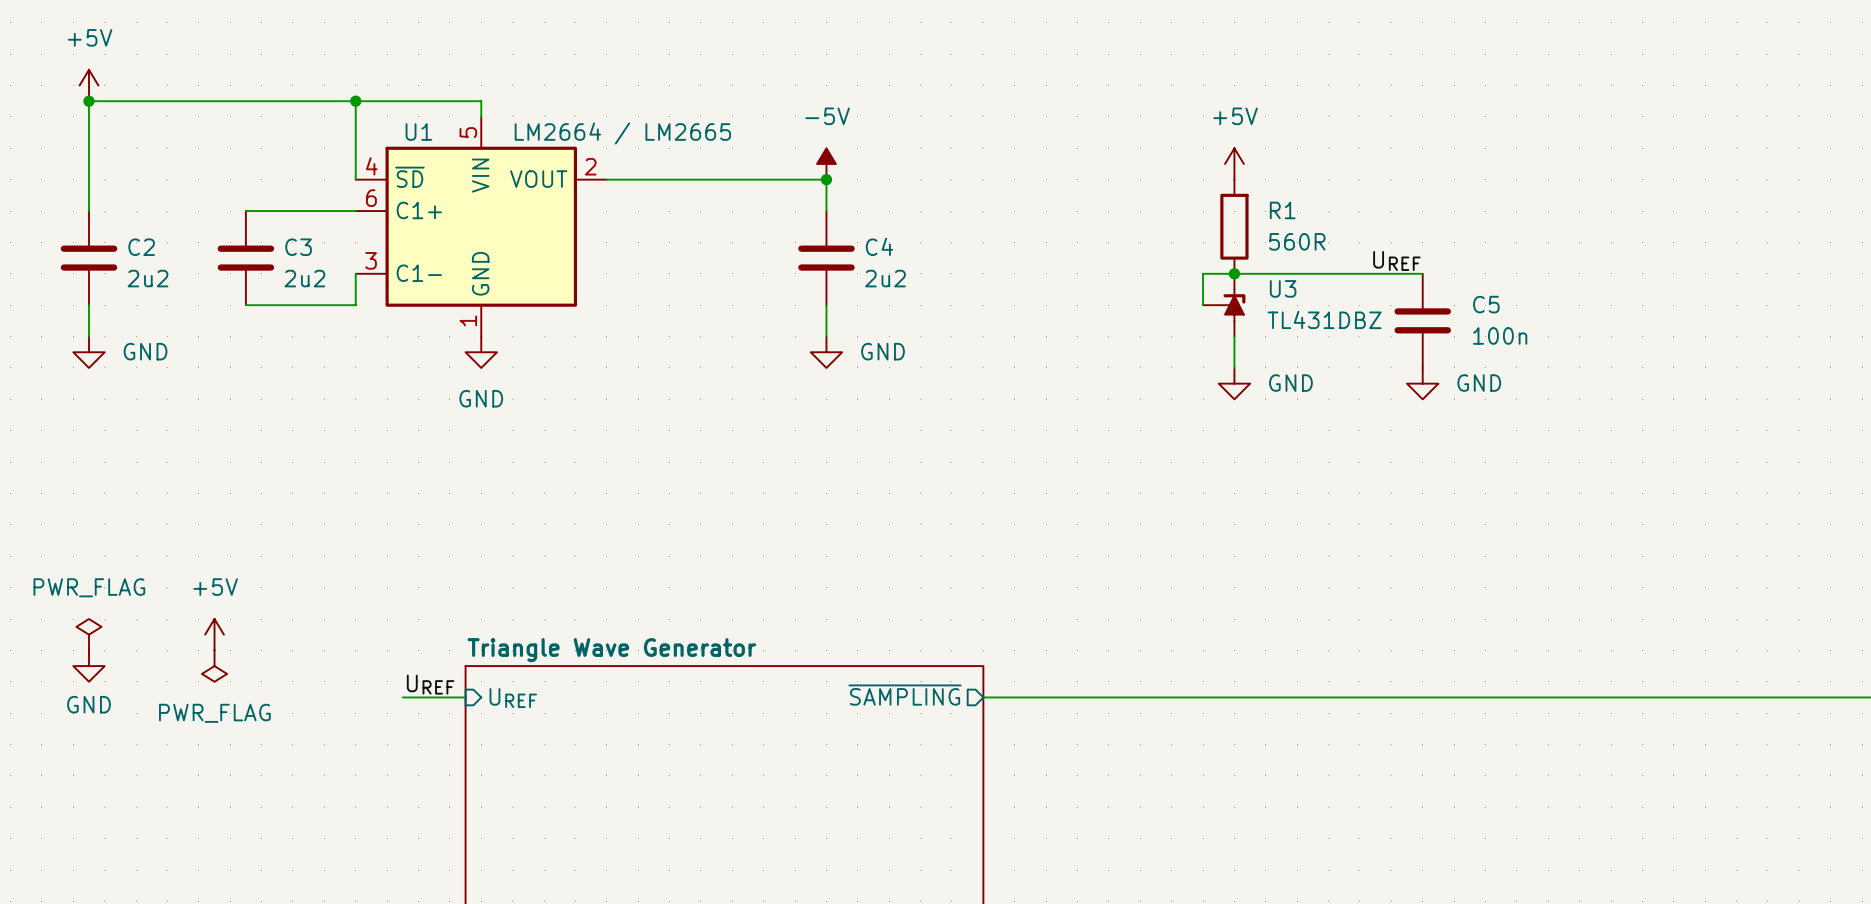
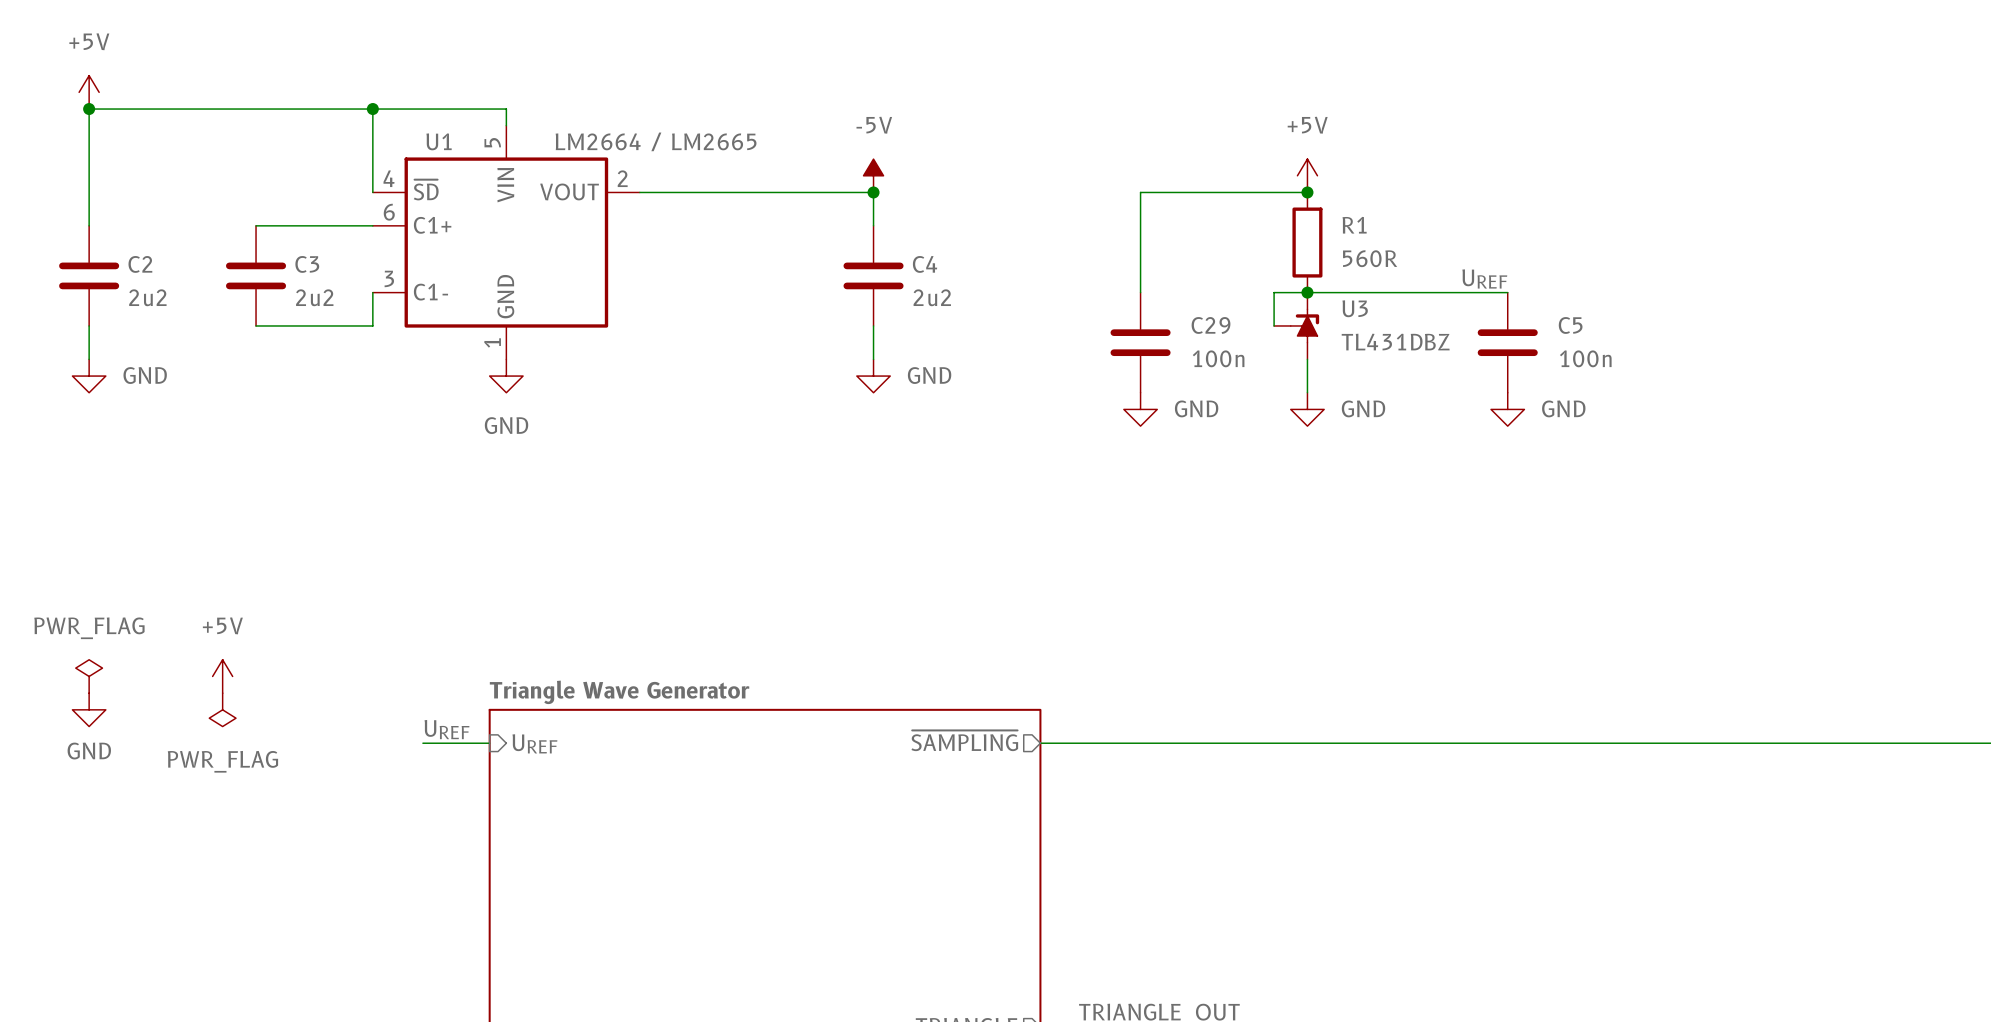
wire: none -> (1307, 192) (1140, 192) (1140, 292)
junction: none -> (1307, 192)
C29: none -> 100n (1140, 342)
power symbol: none -> GND (1140, 409)

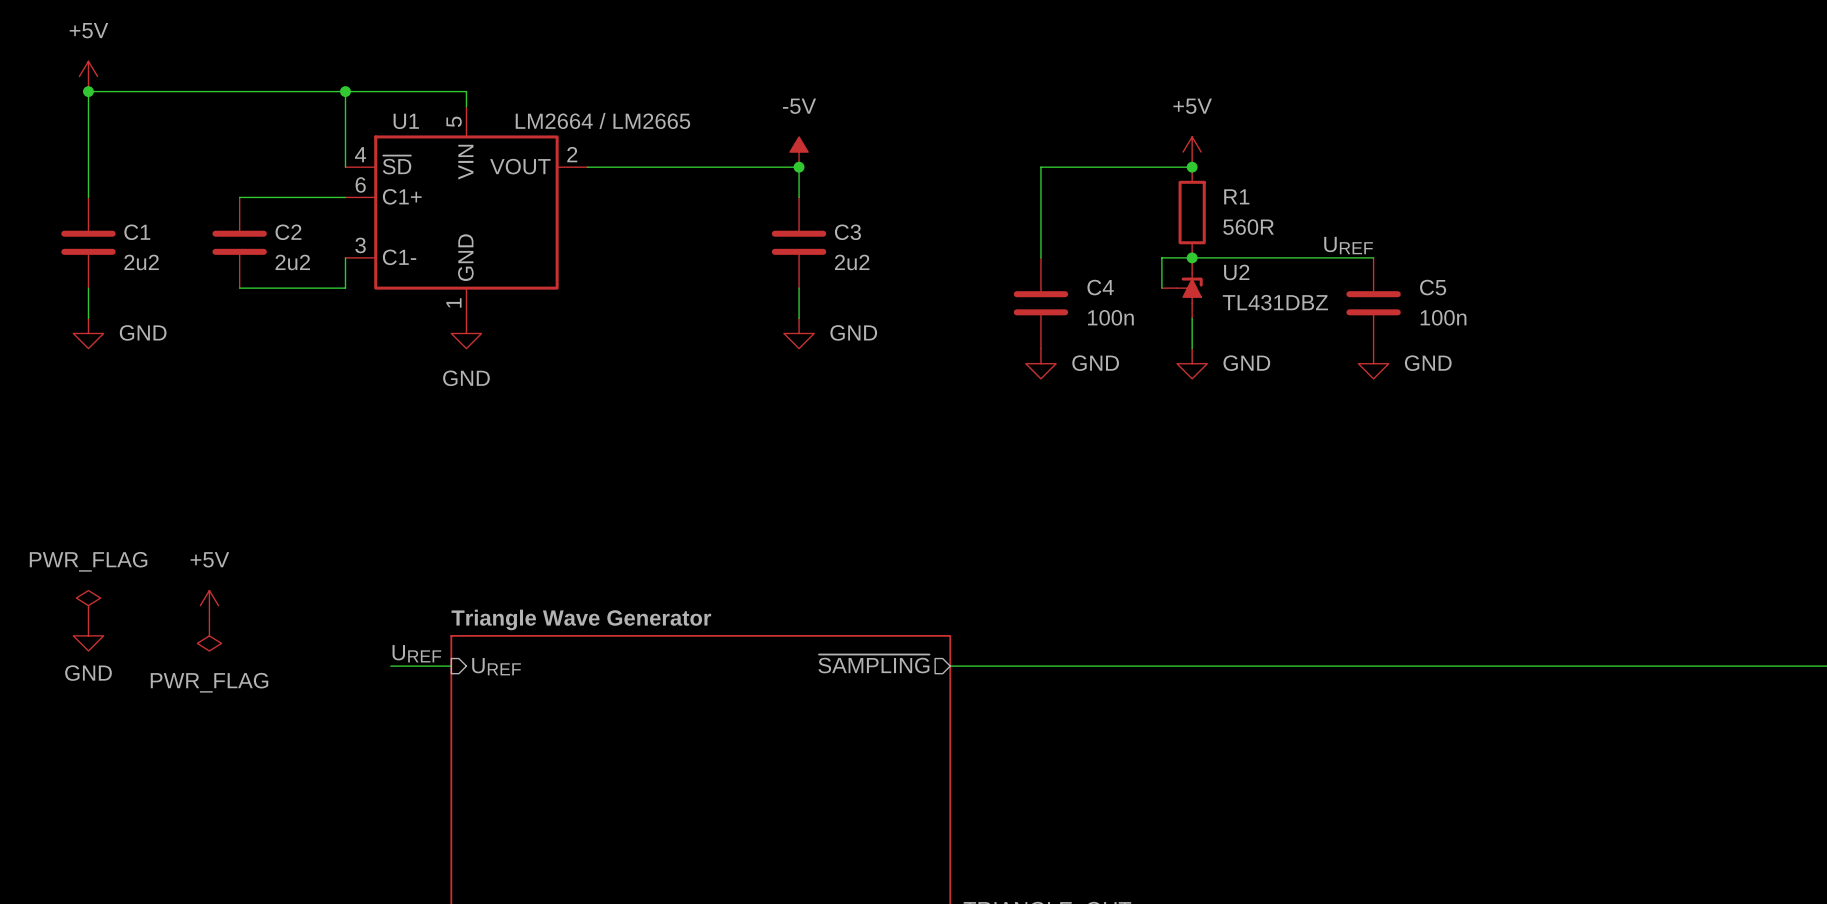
C2 name: C2 (140, 264) -> C1 (137, 232)
C3 name: C3 (307, 264) -> C2 (288, 232)
C4 name: C4 (925, 264) -> C3 (847, 232)
U3 name: U3 (1355, 308) -> U2 (1236, 272)
C29 name: C29 (1211, 325) -> C4 (1100, 287)

